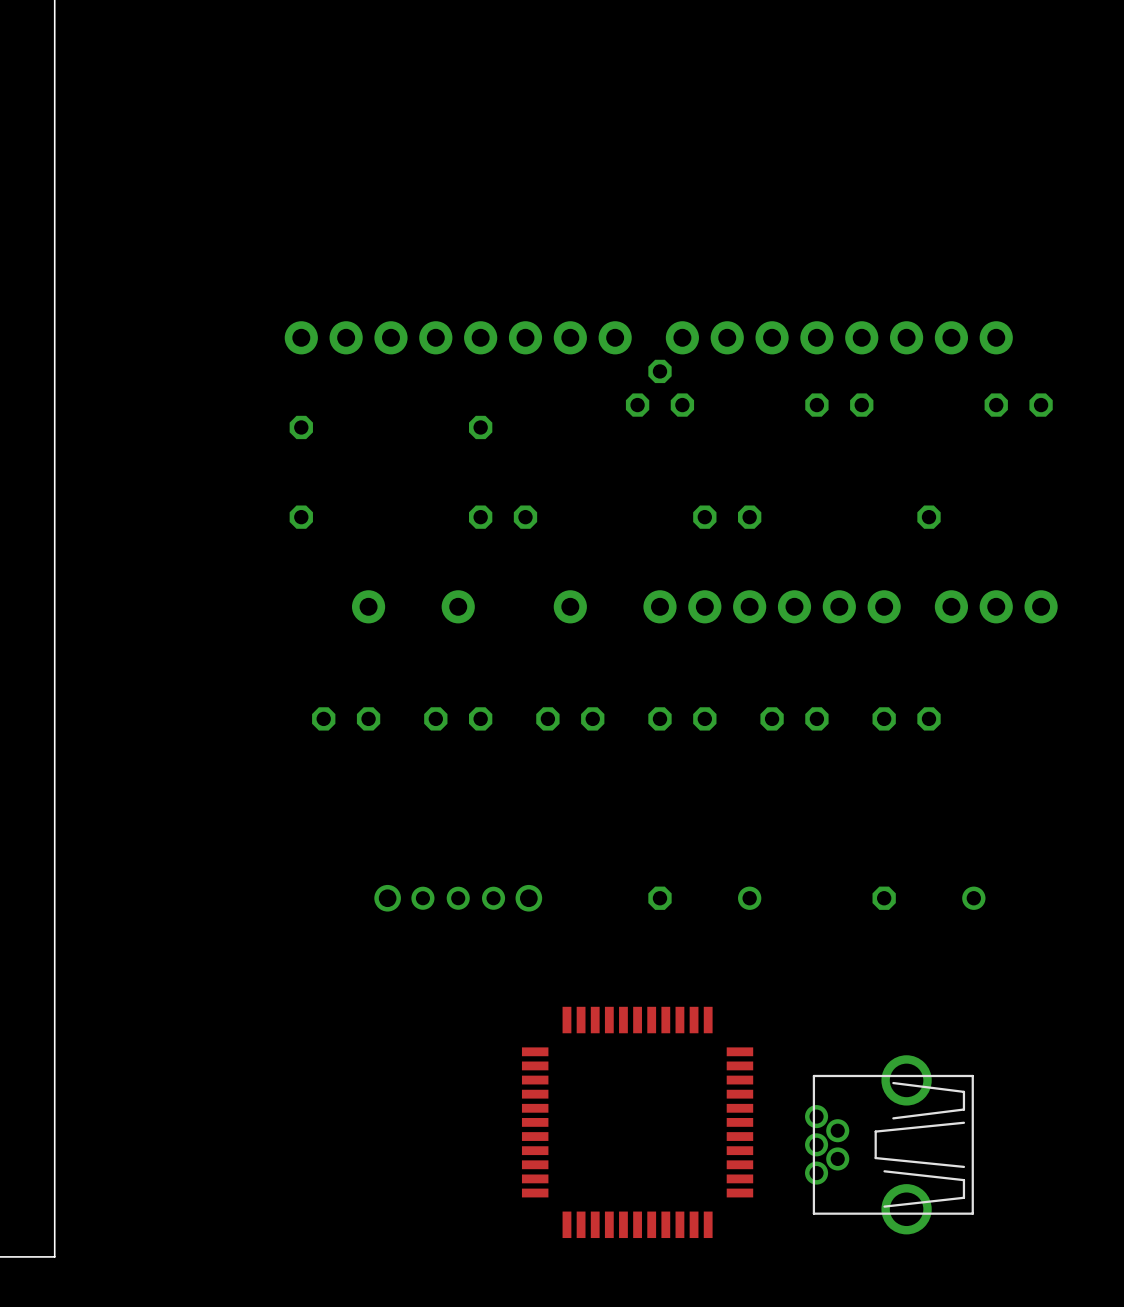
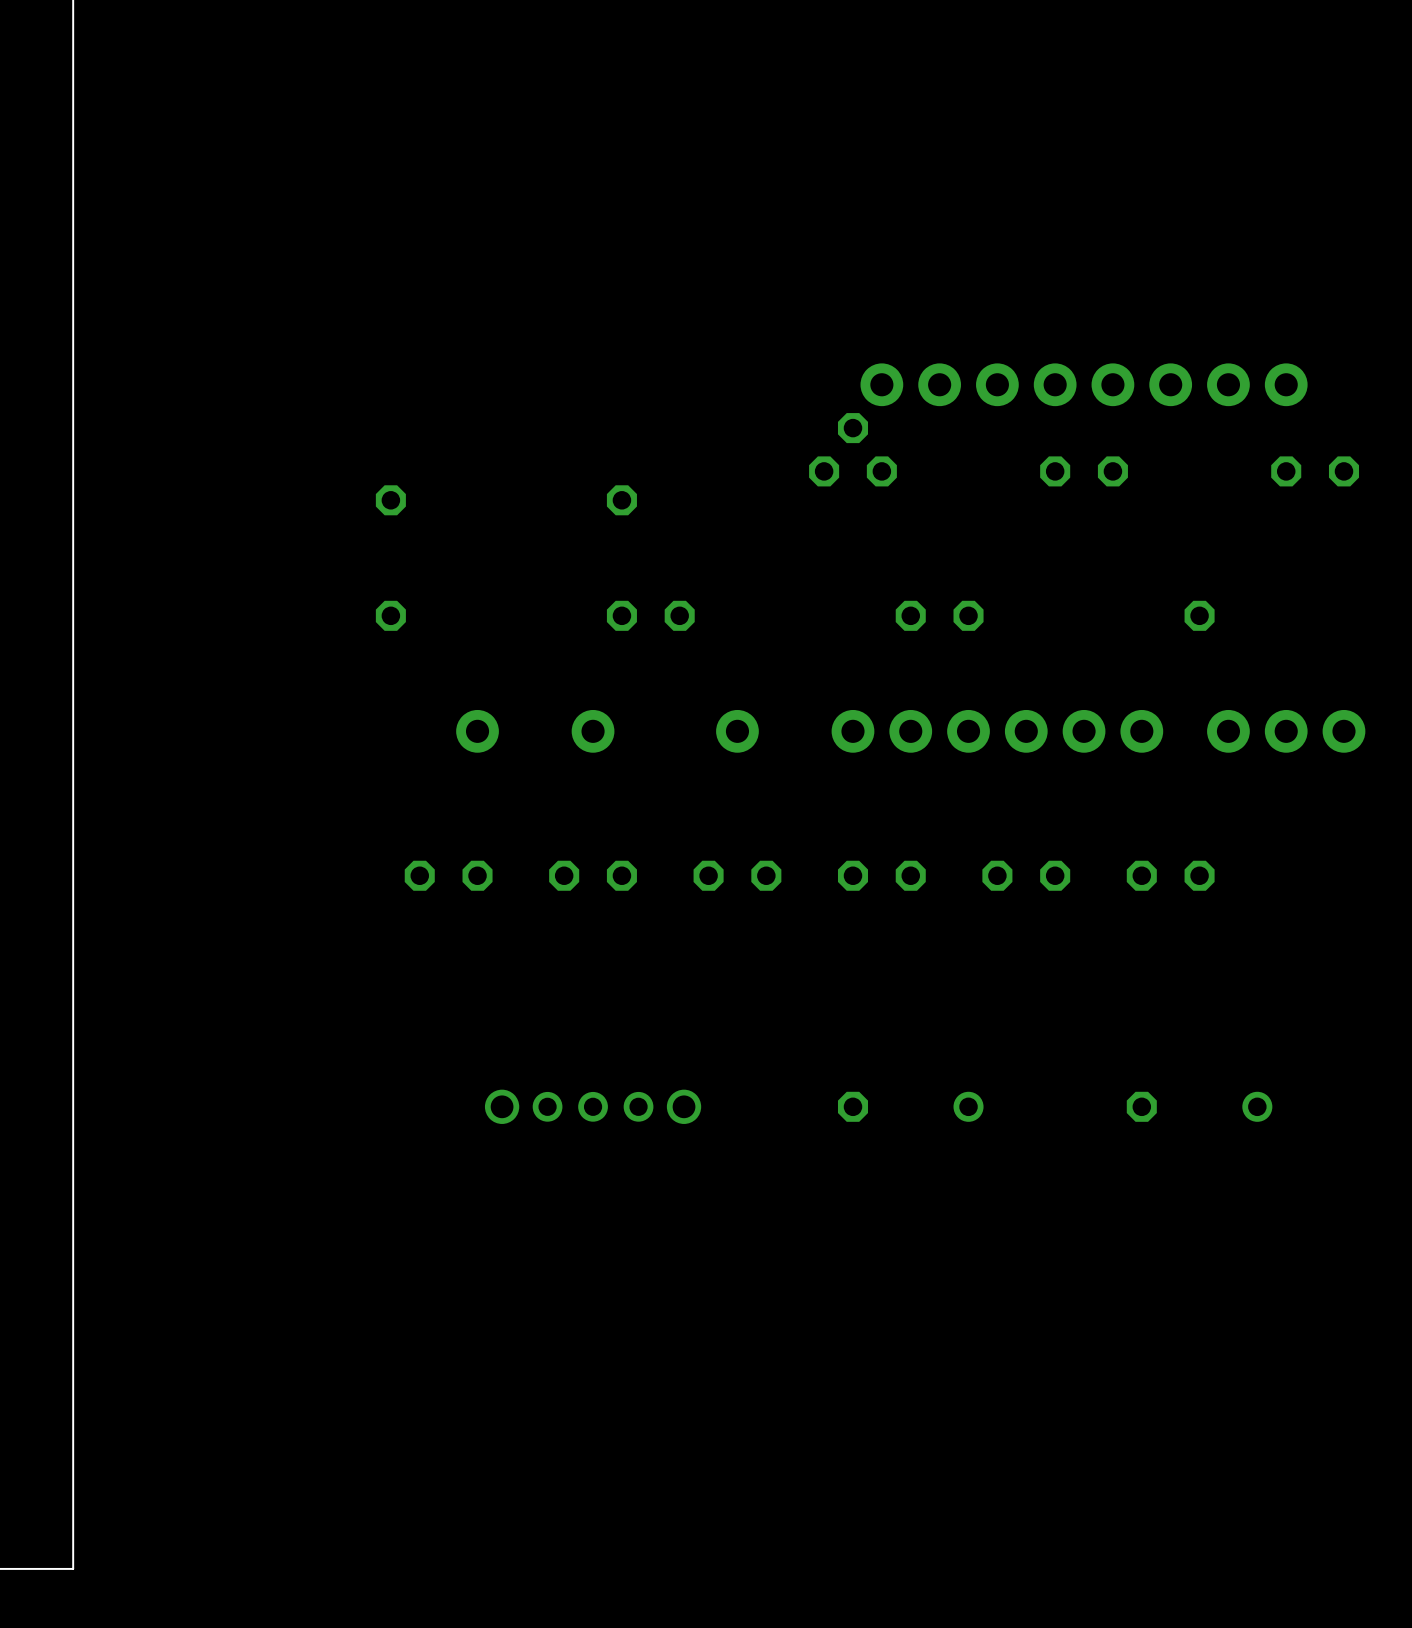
part: (458, 337) -> none
part: (637, 1122) -> none
part: (889, 1144) -> none

